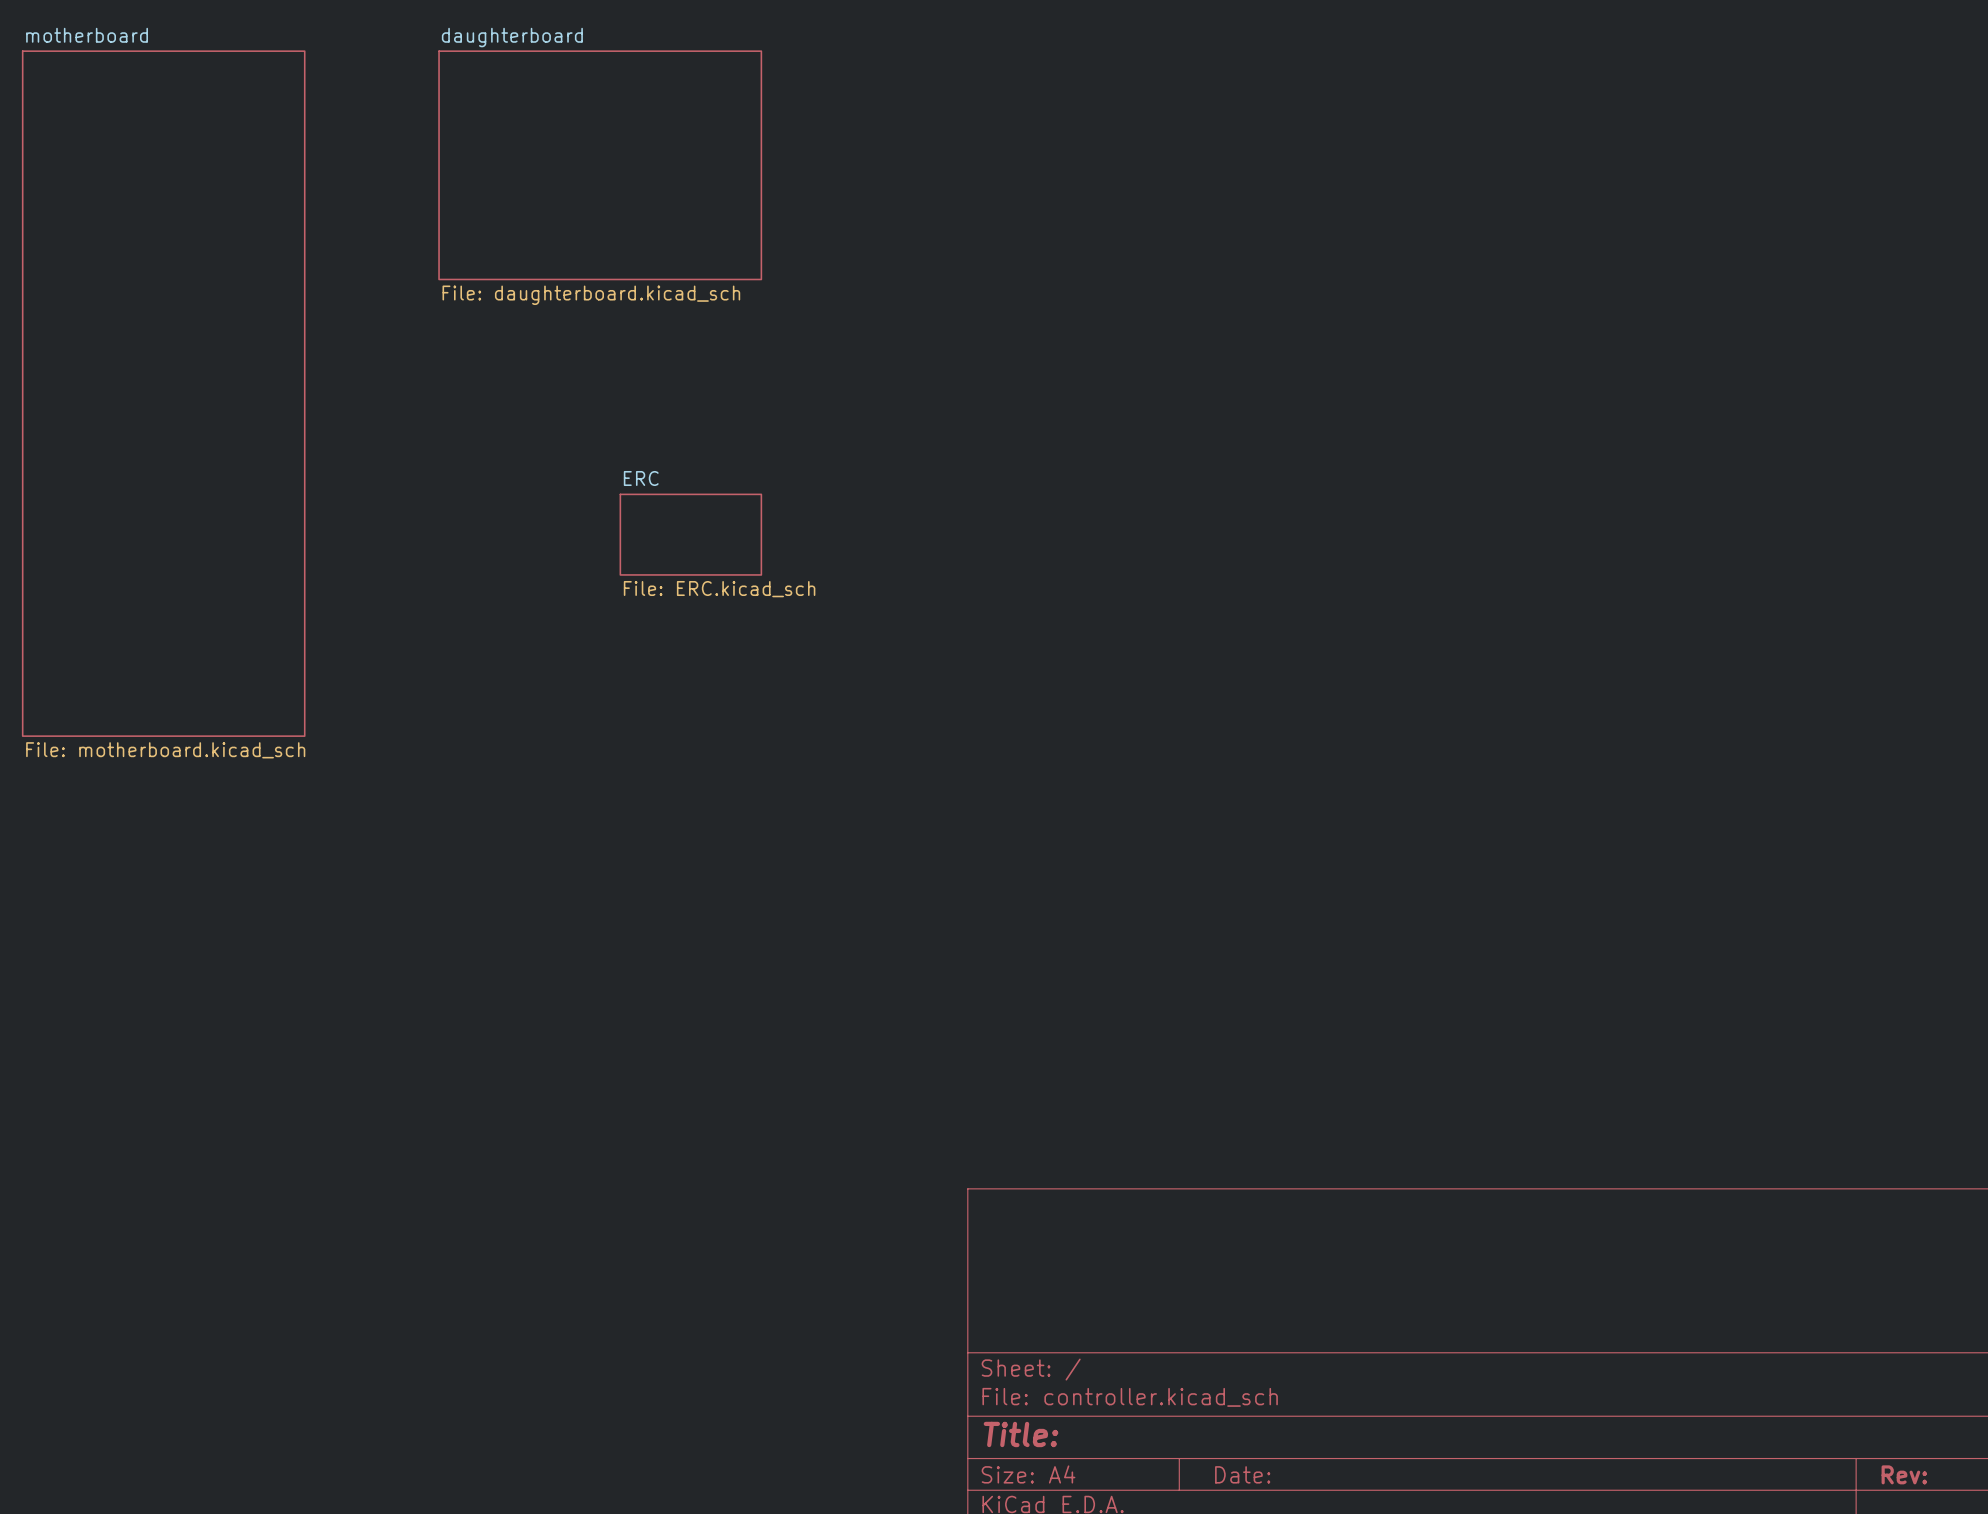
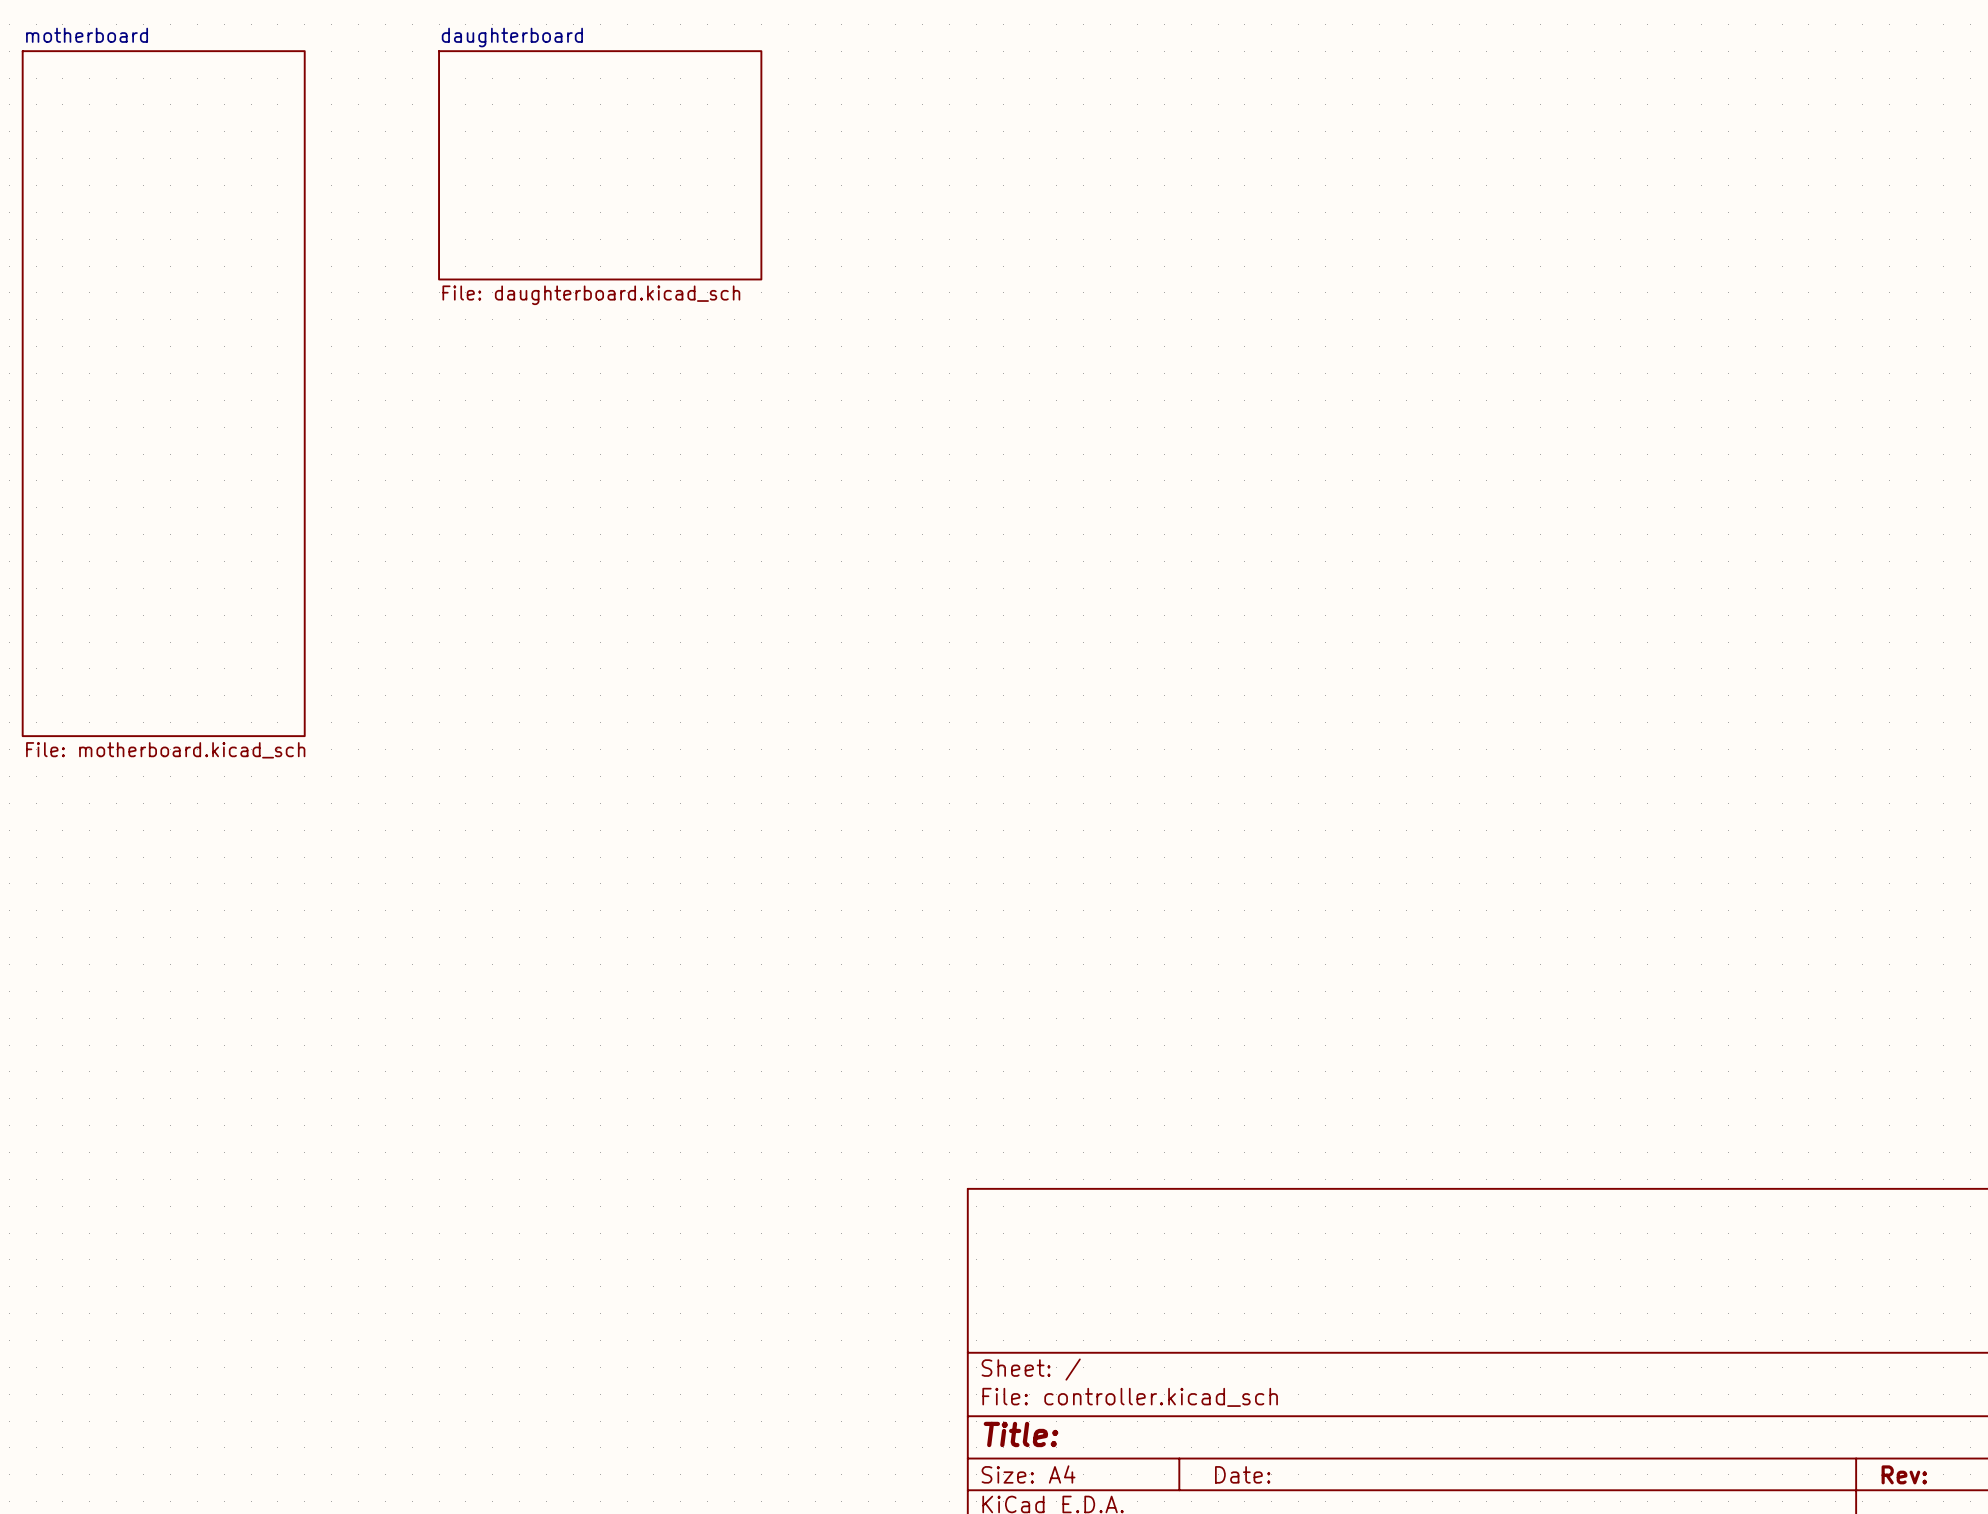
sheet ERC: File: ERC.kicad_sch (690, 534) -> none

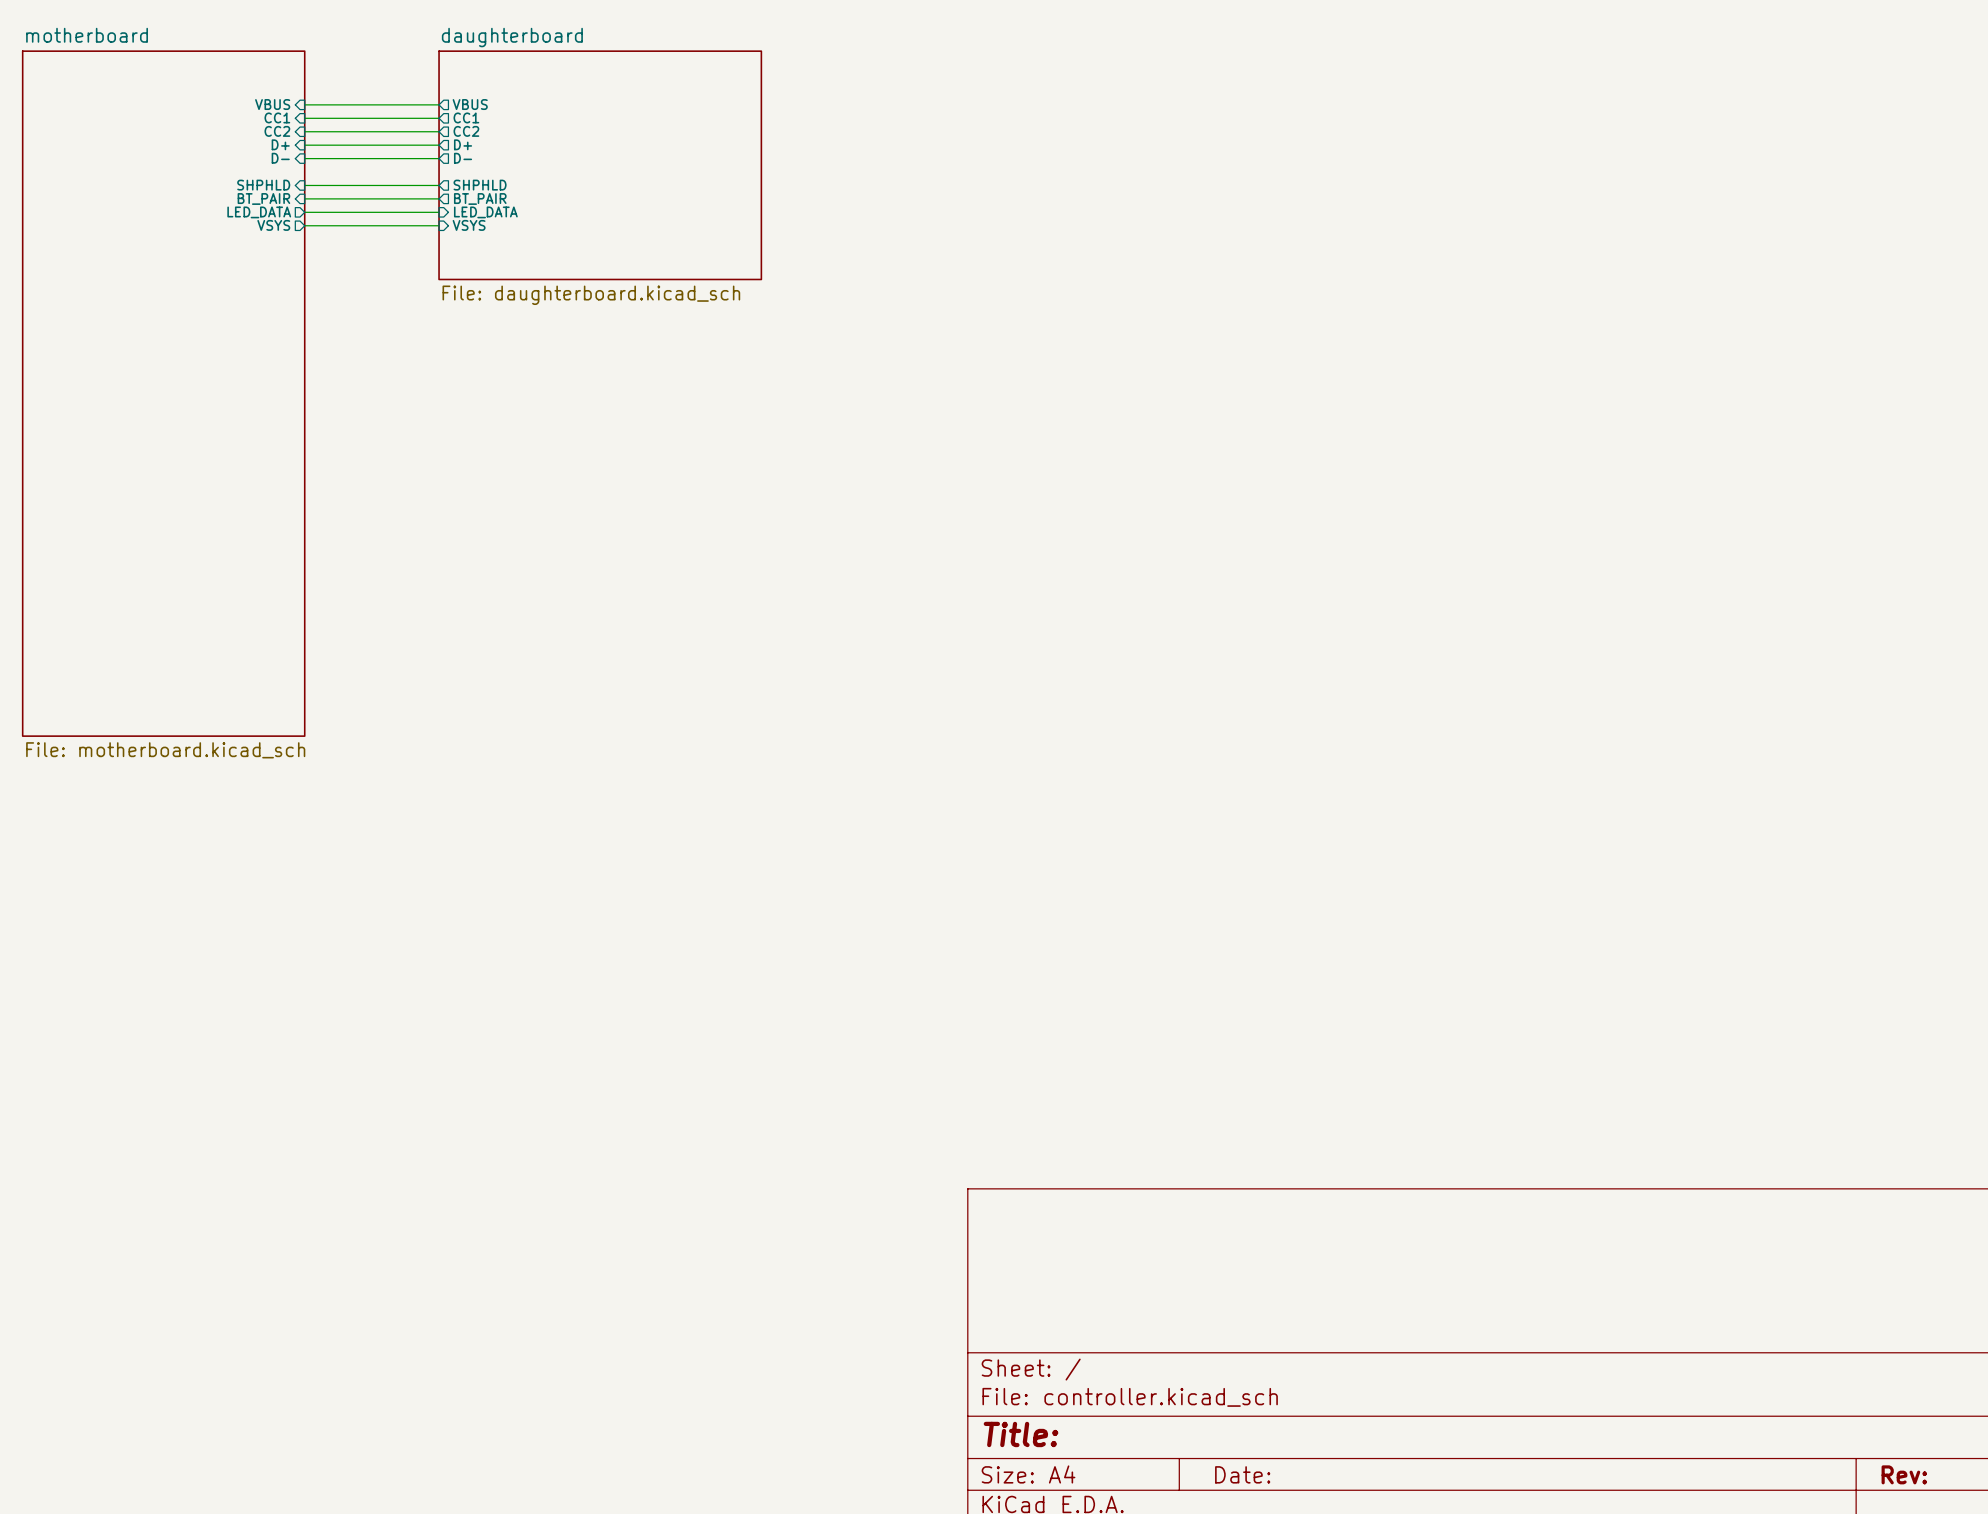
sheet pin: none -> VBUS (272, 104)
wire: none -> (304, 104) (439, 104)
sheet pin: none -> VBUS (470, 104)
sheet pin: none -> CC1 (277, 117)
sheet pin: none -> CC1 (466, 117)
wire: none -> (304, 118) (439, 118)
sheet pin: none -> CC2 (277, 131)
wire: none -> (304, 131) (439, 131)
sheet pin: none -> CC2 (466, 131)
sheet pin: none -> D+ (280, 144)
sheet pin: none -> D+ (463, 144)
wire: none -> (304, 145) (439, 145)
sheet pin: none -> D- (280, 158)
wire: none -> (304, 158) (439, 158)
sheet pin: none -> D- (463, 158)
sheet pin: none -> SHPHLD (263, 185)
wire: none -> (304, 185) (439, 185)
sheet pin: none -> SHPHLD (480, 185)
sheet pin: none -> BT_PAIR (263, 198)
wire: none -> (304, 198) (439, 198)
sheet pin: none -> BT_PAIR (480, 198)
sheet pin: none -> LED_DATA (259, 212)
wire: none -> (304, 212) (439, 212)
sheet pin: none -> LED_DATA (485, 212)
sheet pin: none -> VSYS (273, 225)
wire: none -> (304, 225) (439, 225)
sheet pin: none -> VSYS (469, 225)

